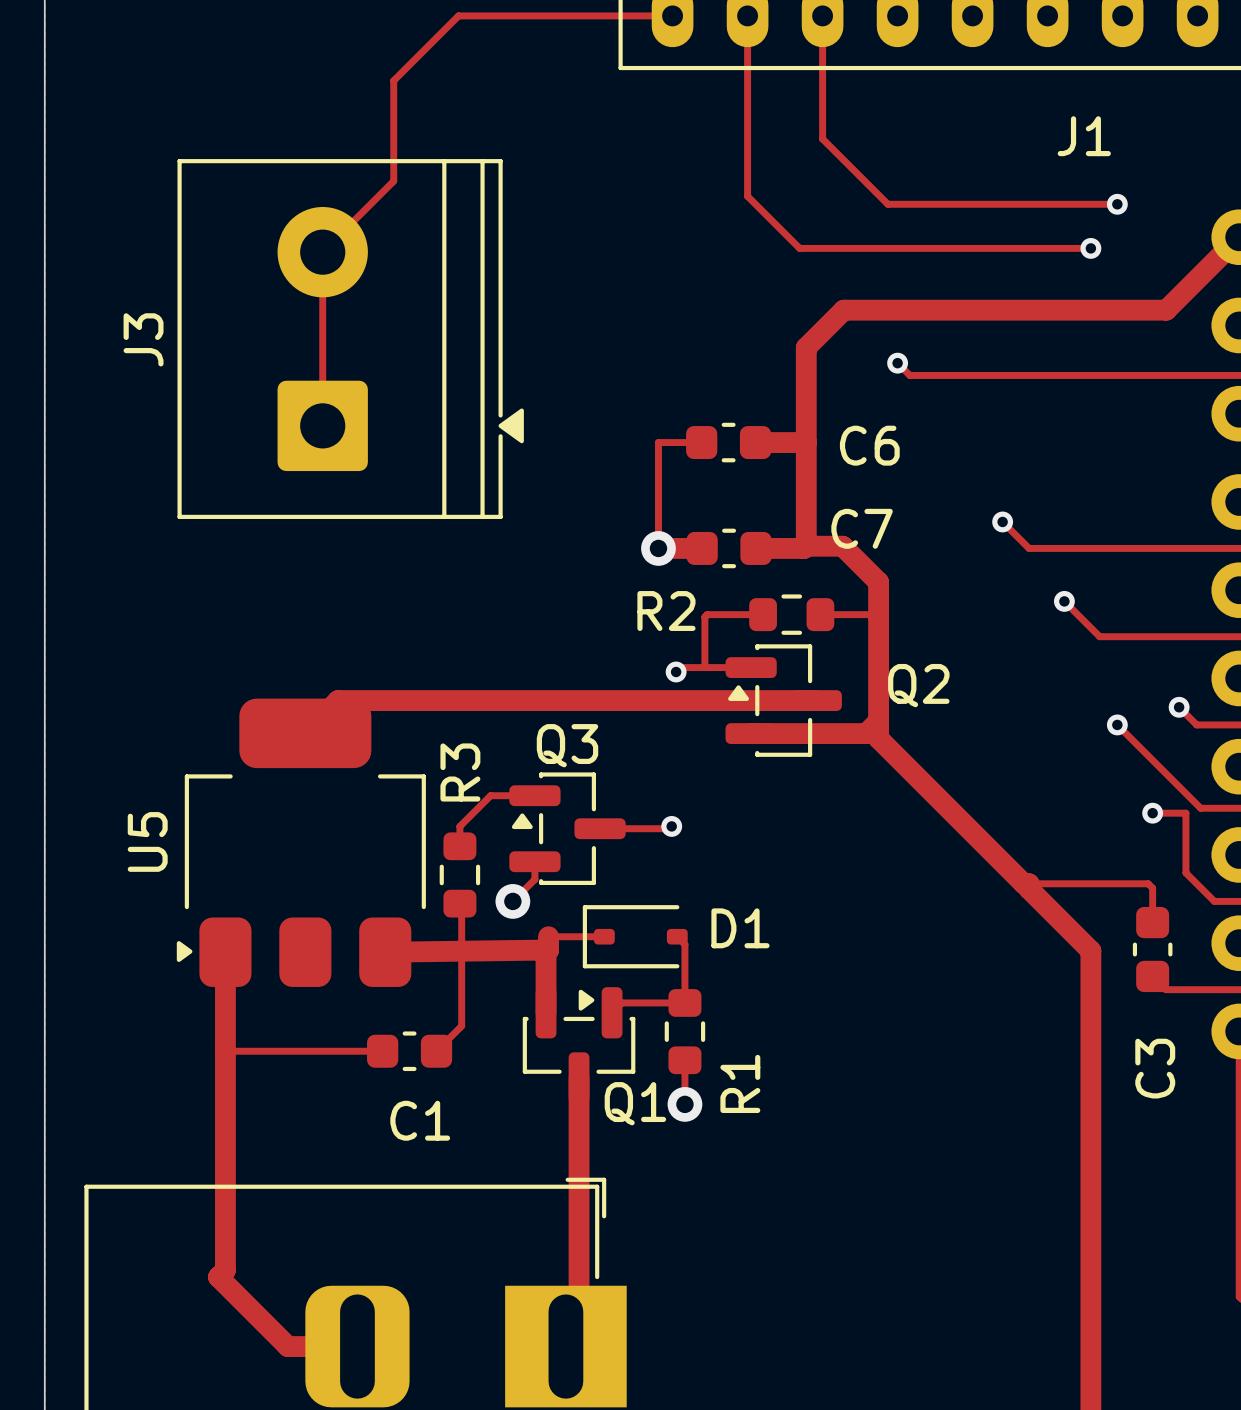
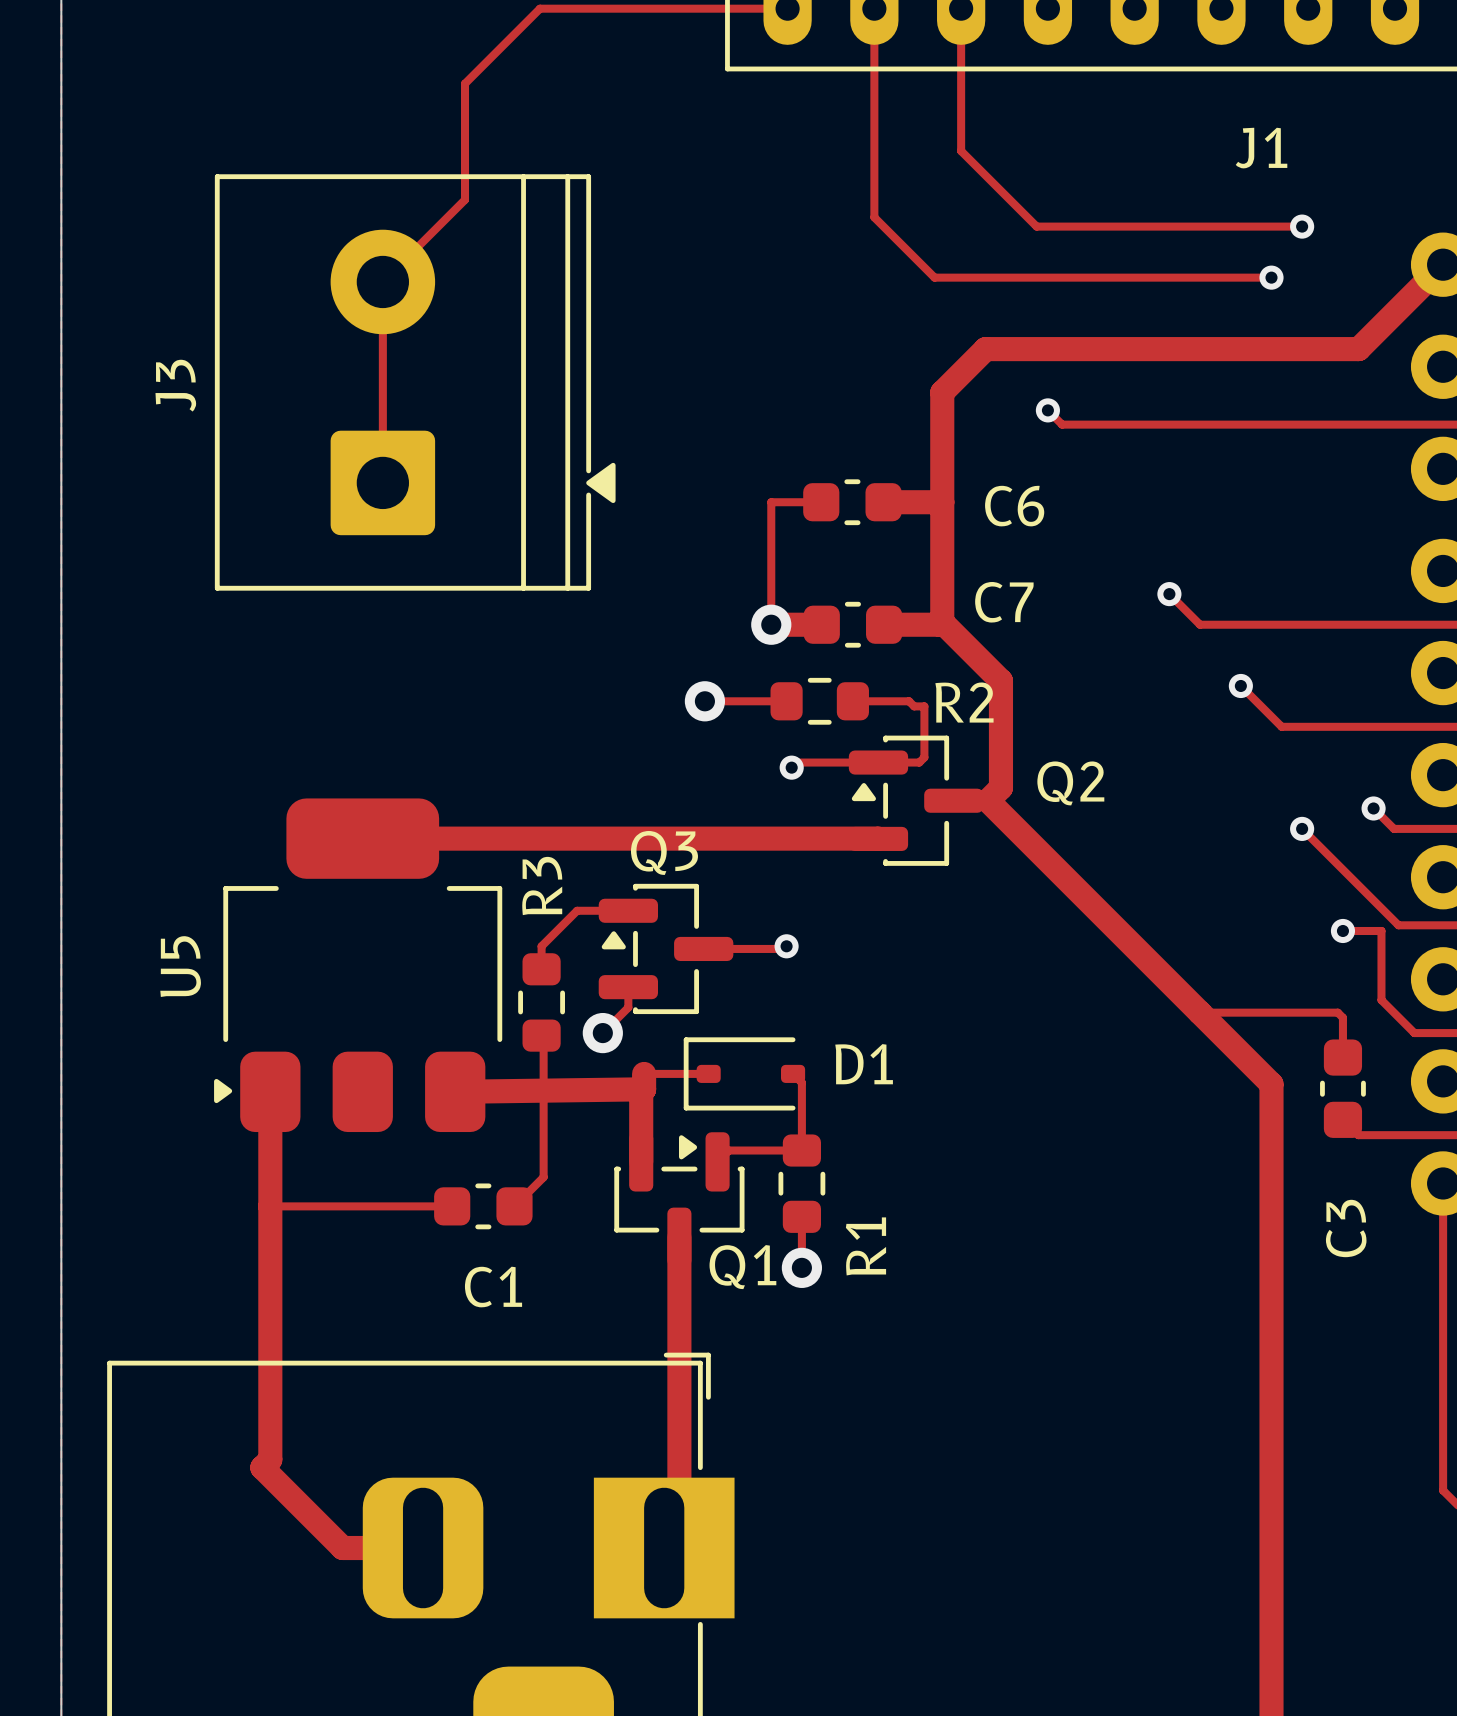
track: (806, 546) (842, 546) (878, 582) (878, 738) (1023, 883) (1029, 883) (1029, 888) (1090, 950) -> (942, 622) (1000, 680) (1000, 787) (988, 800) (1271, 1084) (1271, 1090)
R2 name position: R2 (666, 611) -> R2 (964, 702)
track: none -> (704, 701) (786, 701)
via: none -> (704, 701)
track: (729, 614) (707, 614) (704, 616) (704, 667) -> none
track: none -> (892, 701) (909, 701) (914, 706) (924, 706) (924, 757) (919, 762) (878, 762)
R2 position: (791, 614) -> (819, 701)
track: (820, 614) (876, 614) (878, 616) -> none
track: (816, 700) (338, 700) (305, 733) -> (878, 838) (362, 838)
track: (878, 721) (866, 733) (751, 733) -> none

